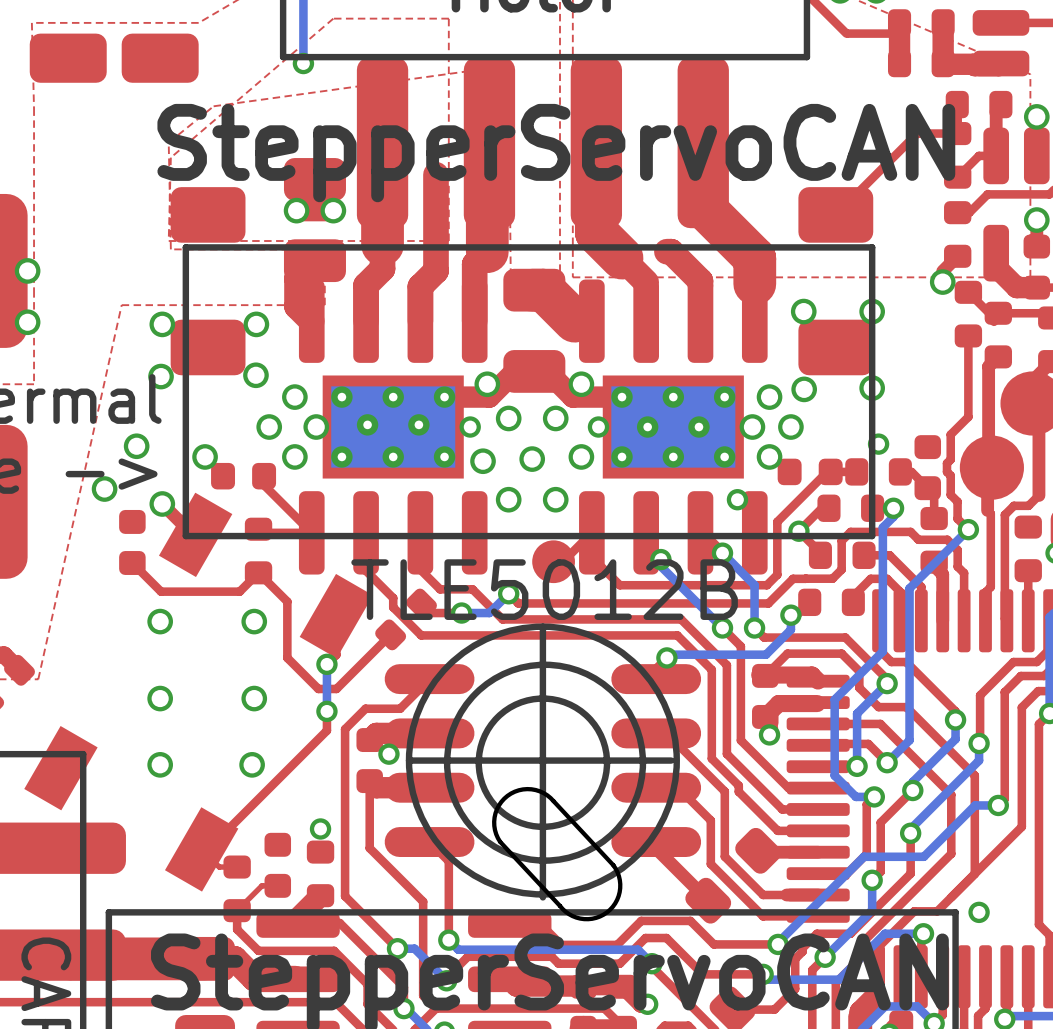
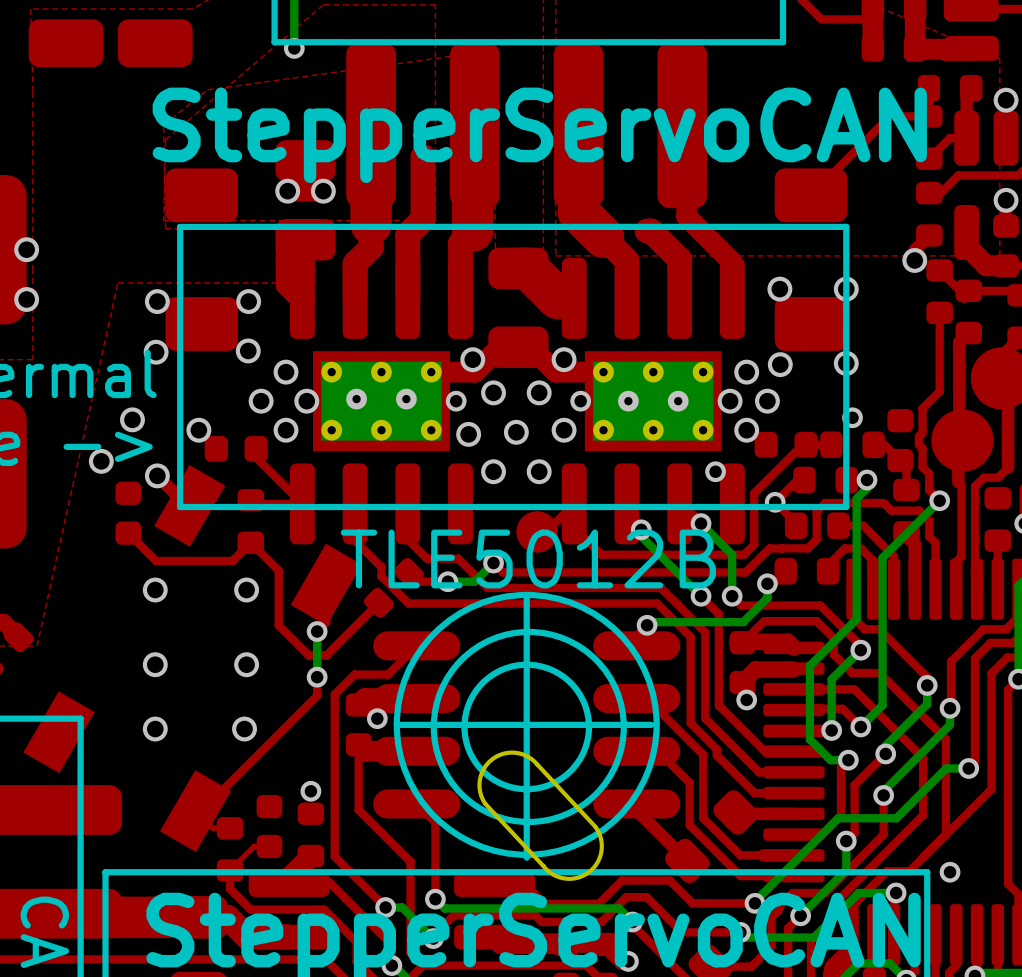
top track: (707, 211) (754, 258) (754, 283) -> (686, 191) (686, 216) (732, 262)
top track: (435, 239) (435, 270) (420, 286) -> (422, 219) (407, 234) (407, 264)

